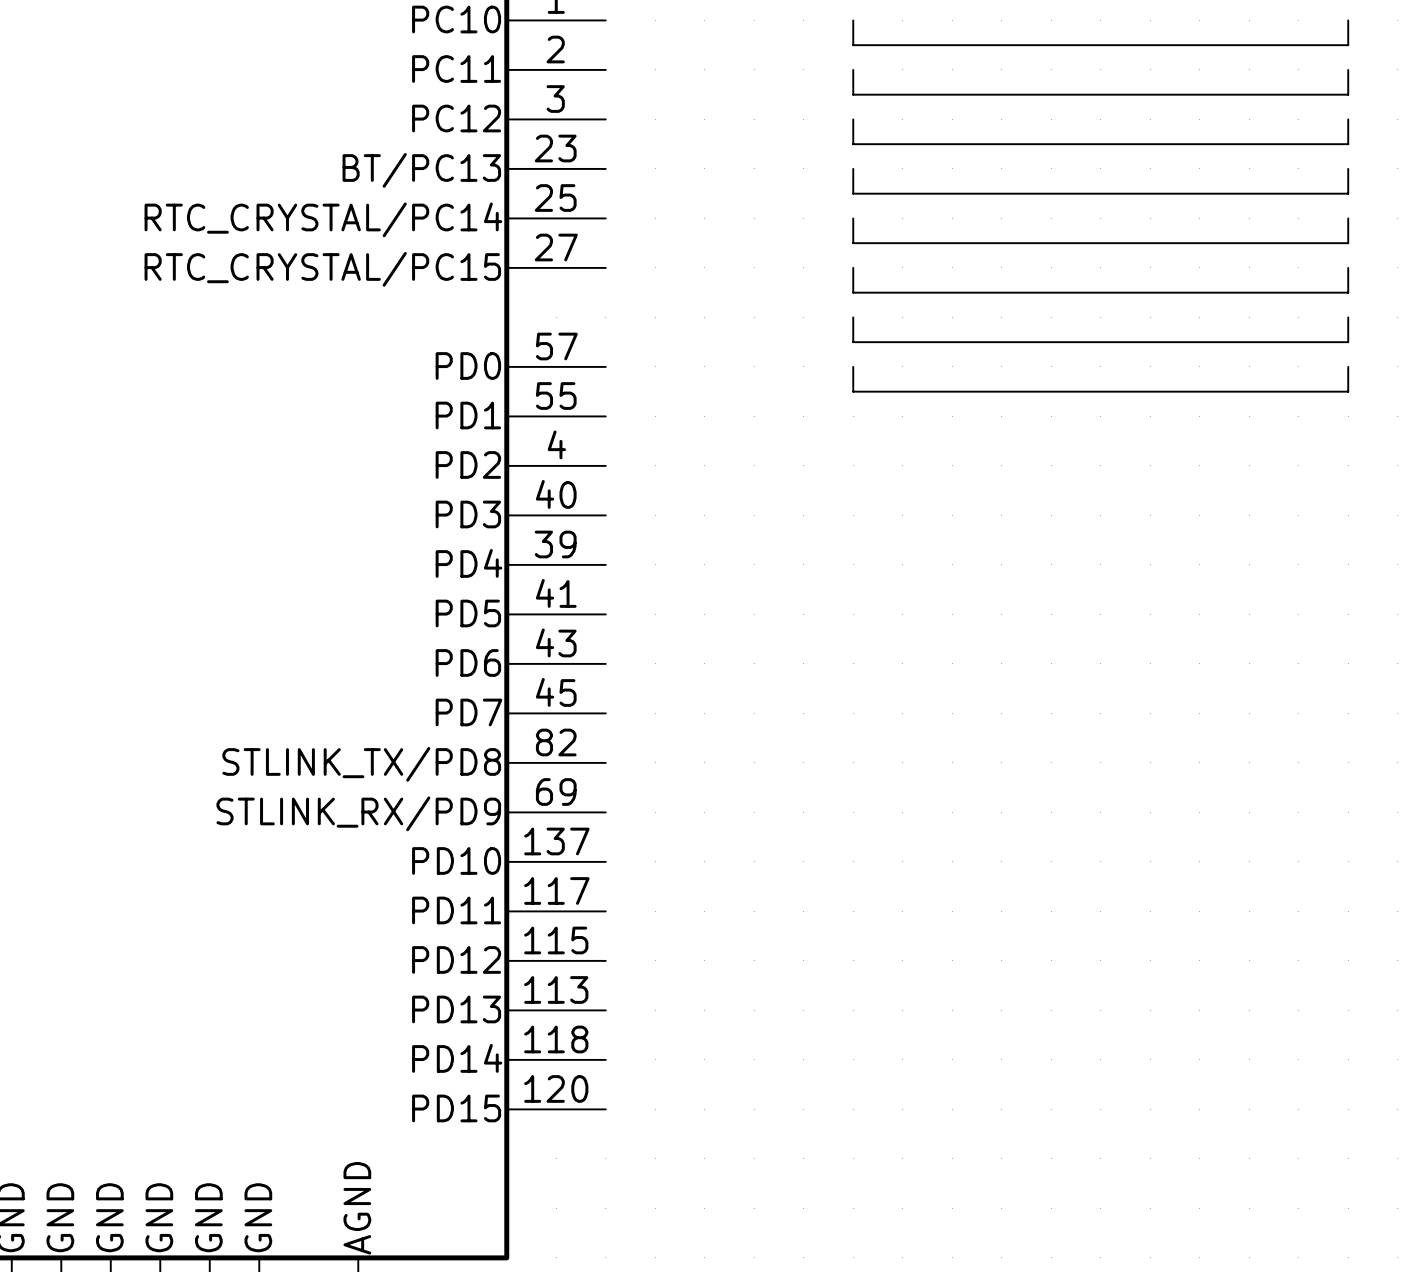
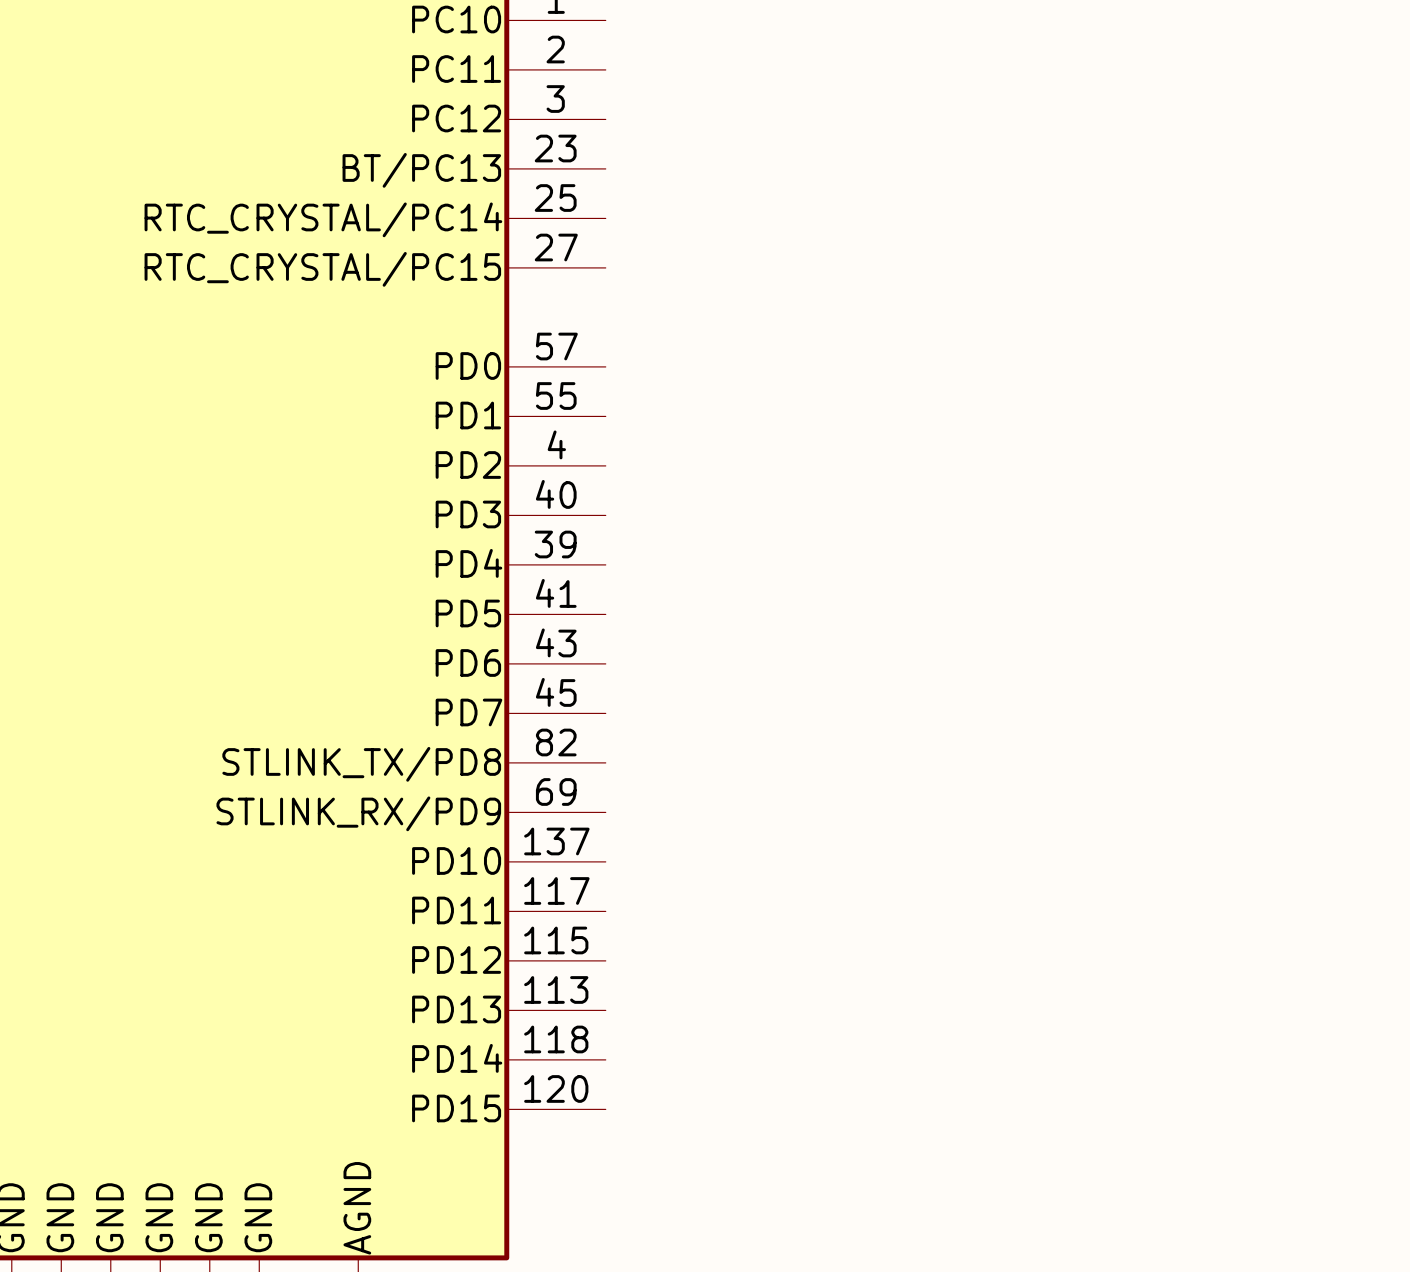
wire: (853, 20) (853, 45) (1348, 45) (1348, 20) -> none
wire: (853, 69) (853, 94) (1348, 94) (1348, 69) -> none
wire: (853, 119) (853, 144) (1348, 144) (1348, 119) -> none
wire: (853, 168) (853, 193) (1348, 193) (1348, 168) -> none
wire: (853, 218) (853, 243) (1348, 243) (1348, 218) -> none
wire: (853, 267) (853, 292) (1348, 292) (1348, 267) -> none
wire: (853, 317) (853, 342) (1348, 342) (1348, 317) -> none
wire: (853, 366) (853, 391) (1348, 391) (1348, 366) -> none

